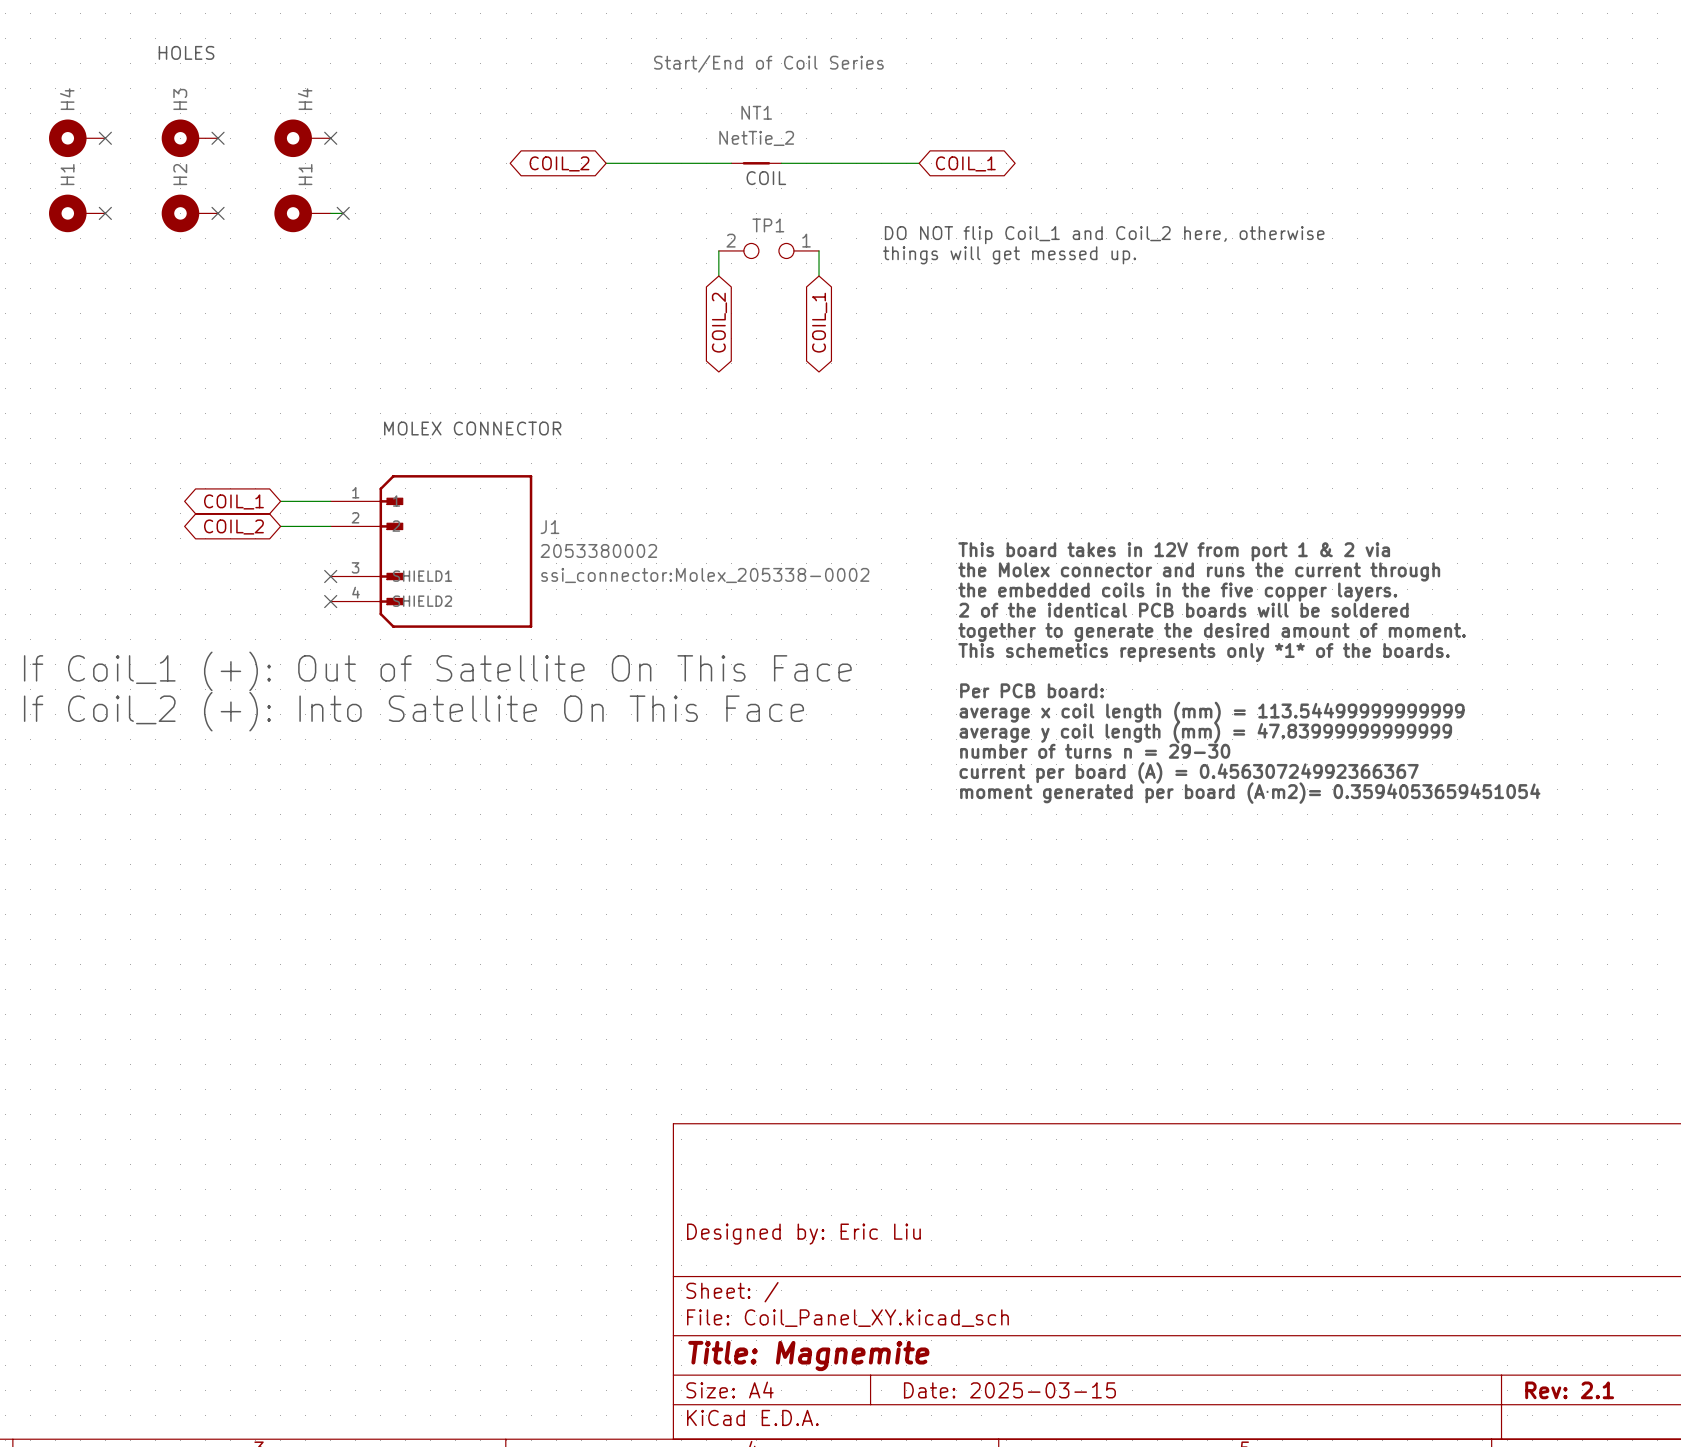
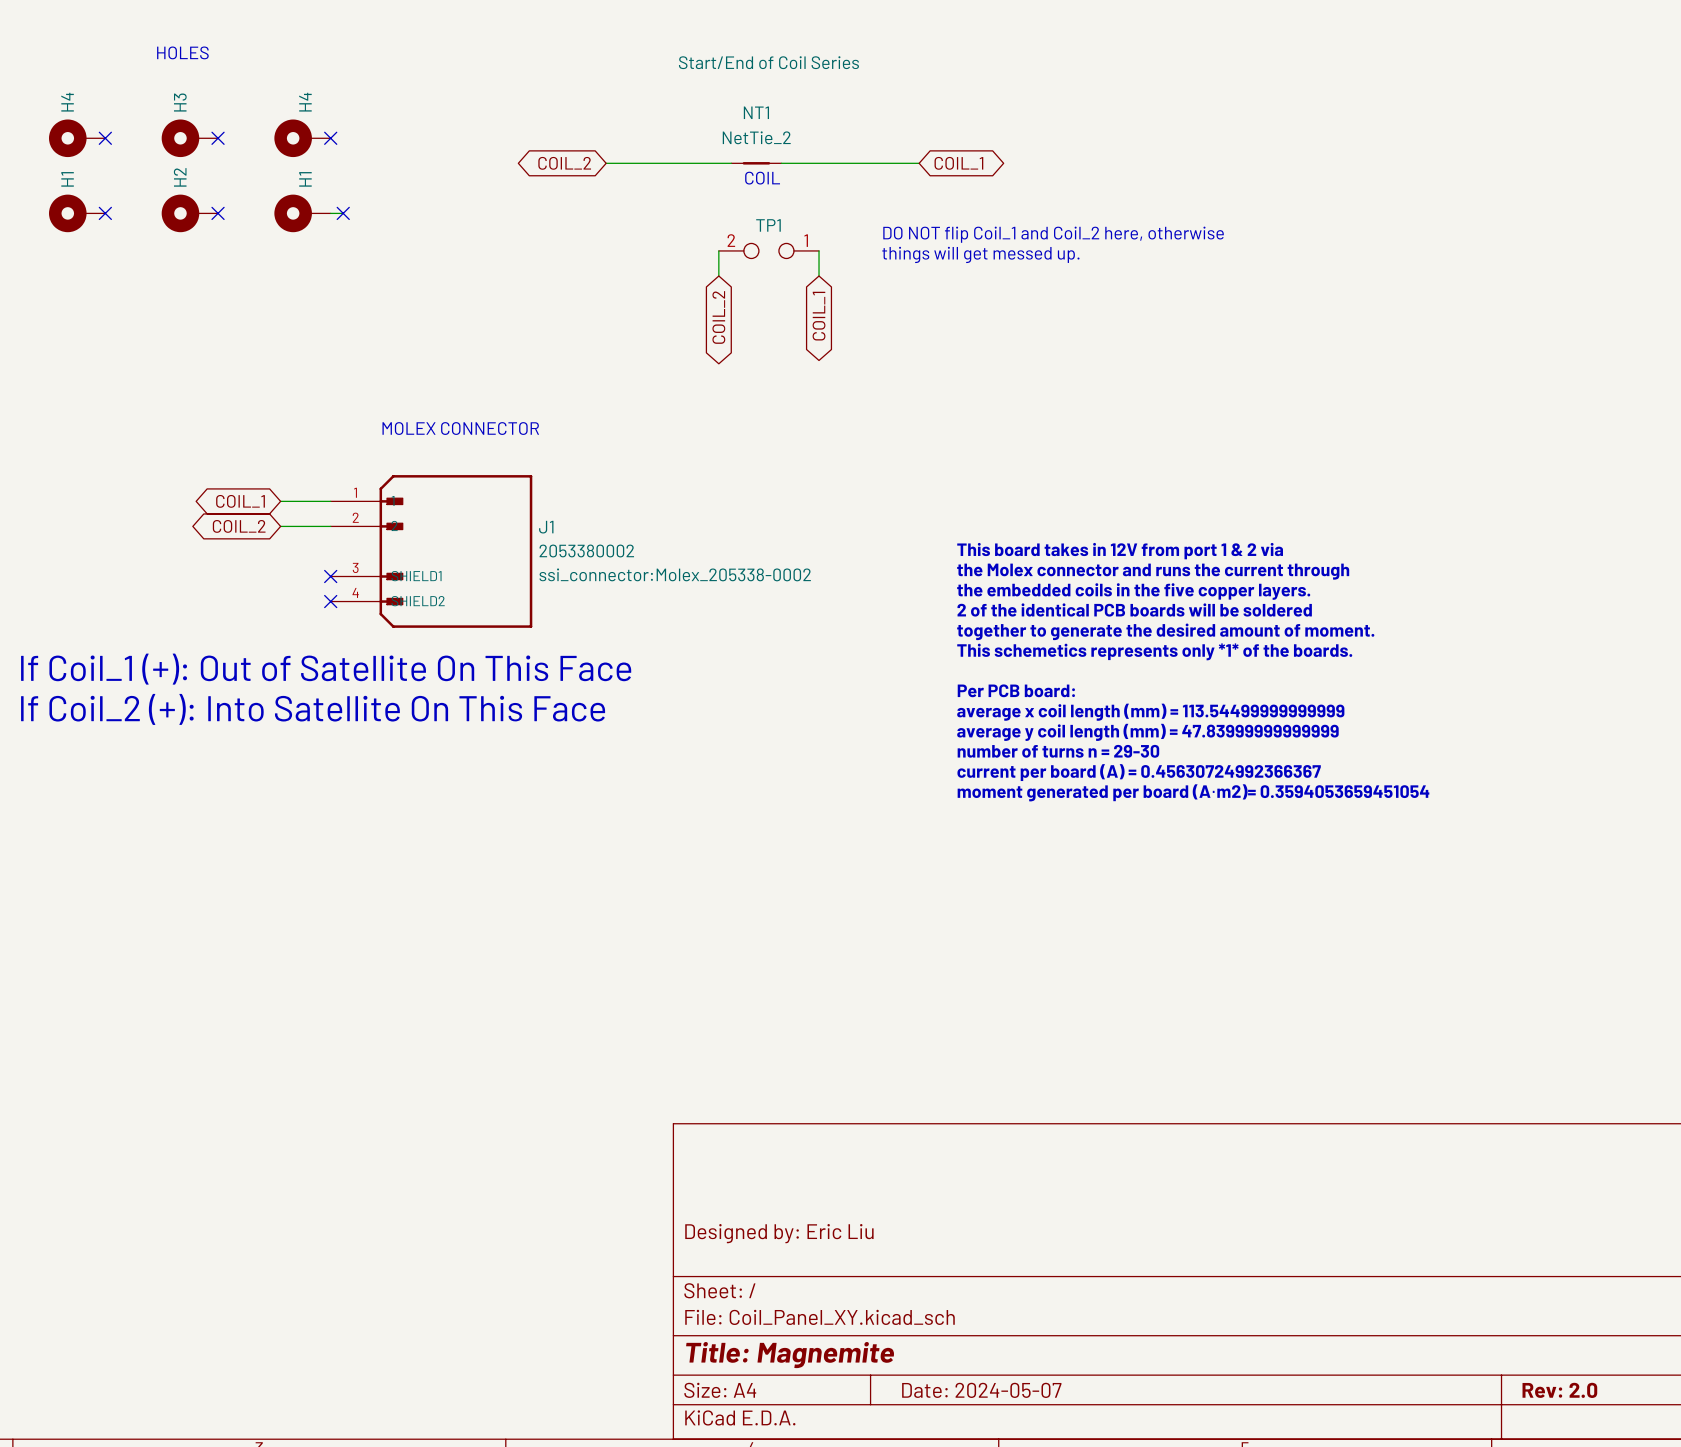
title block: Date: 2025-03-15 (1009, 1390) -> Date: 2024-05-07 (981, 1390)
title block: Rev: 2.1 (1569, 1390) -> Rev: 2.0 (1559, 1390)

